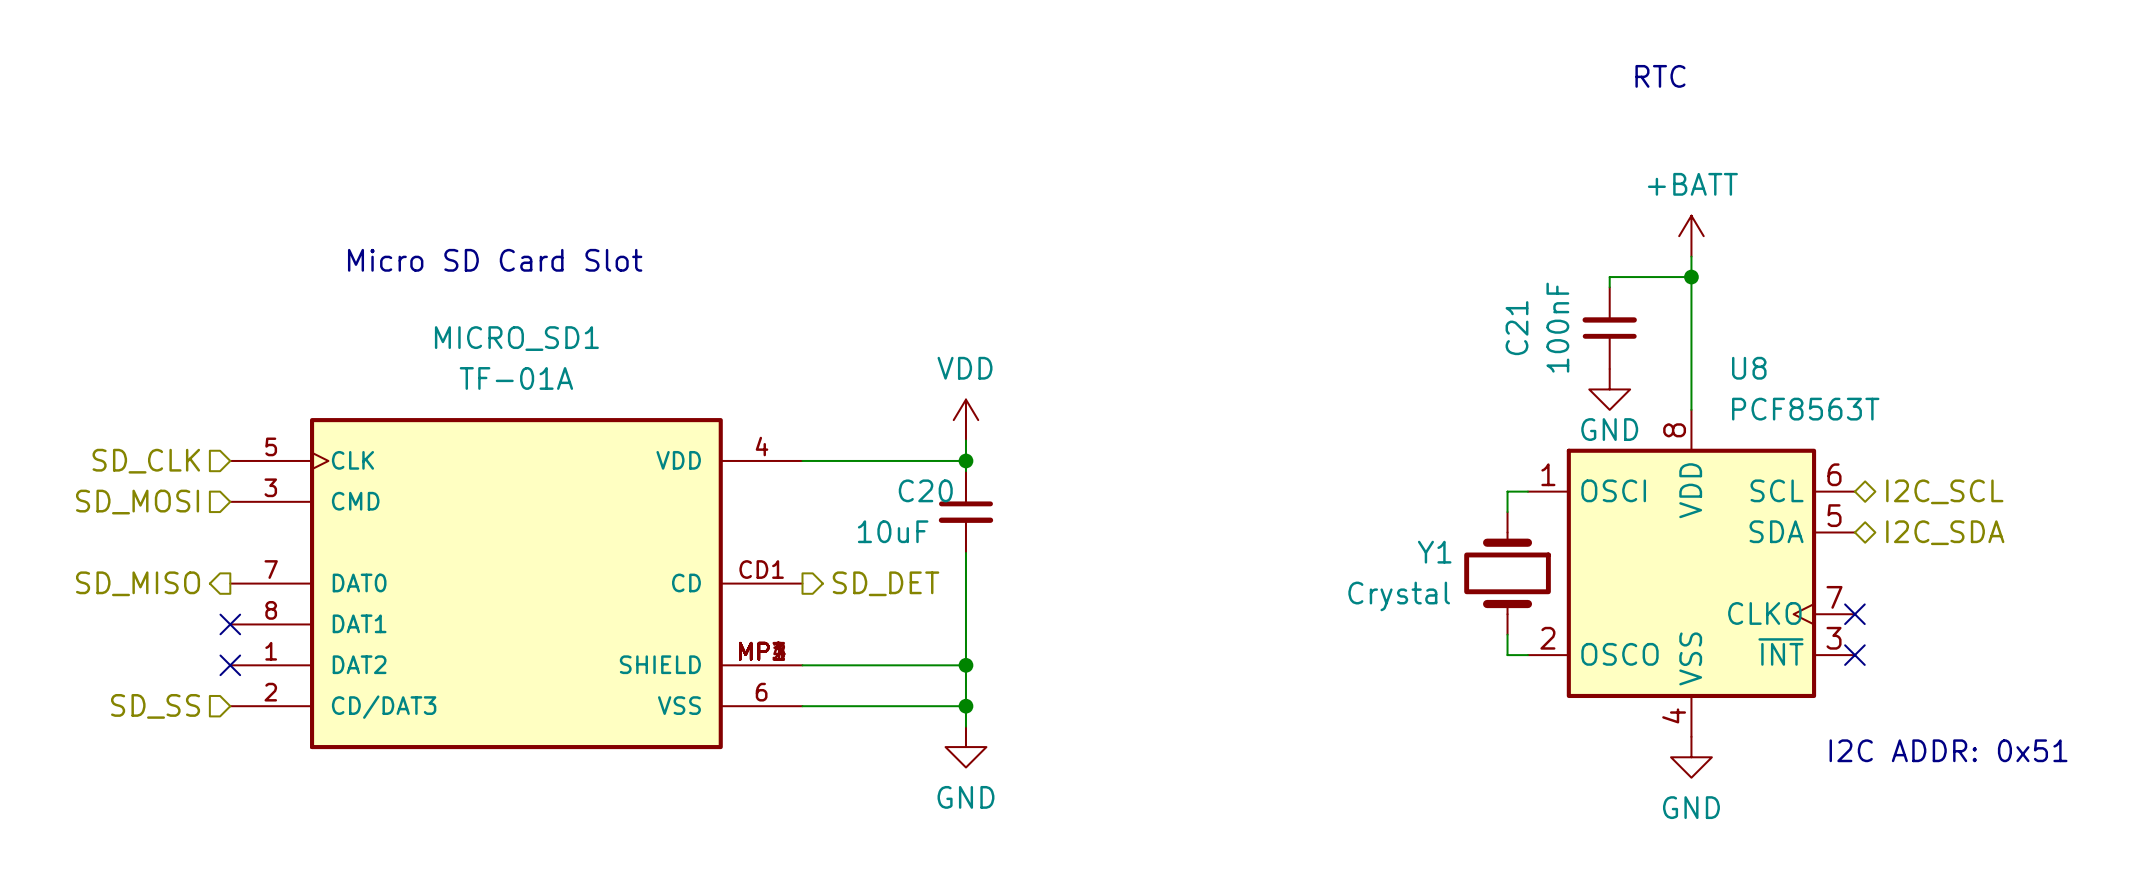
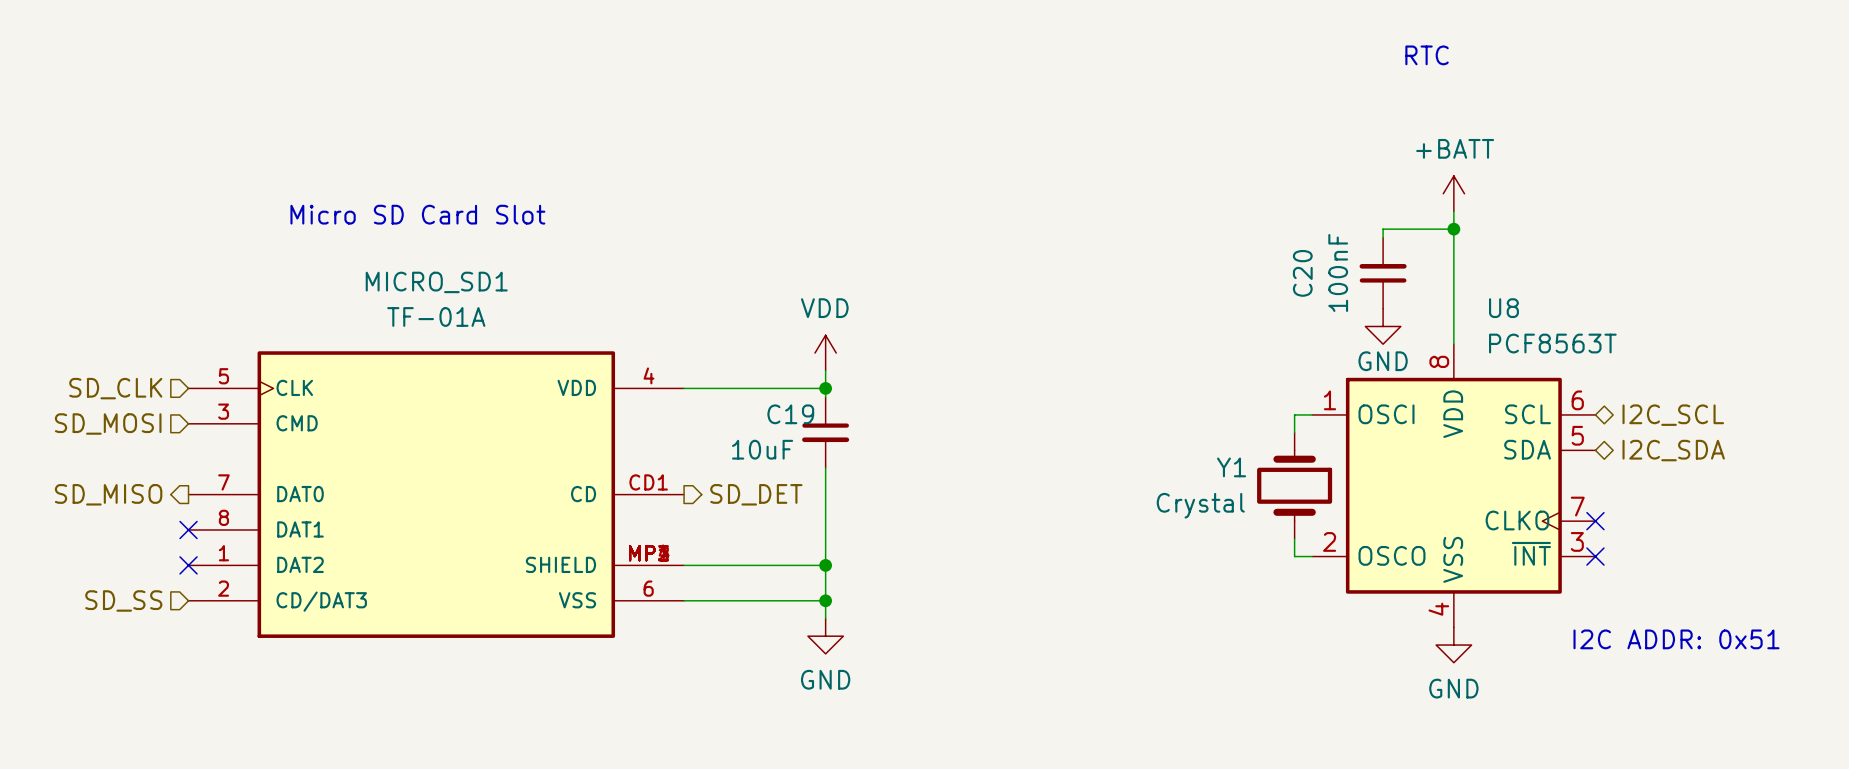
C21 name: C21 (1516, 328) -> C20 (1302, 273)
C20 name: C20 (925, 490) -> C19 (790, 414)

